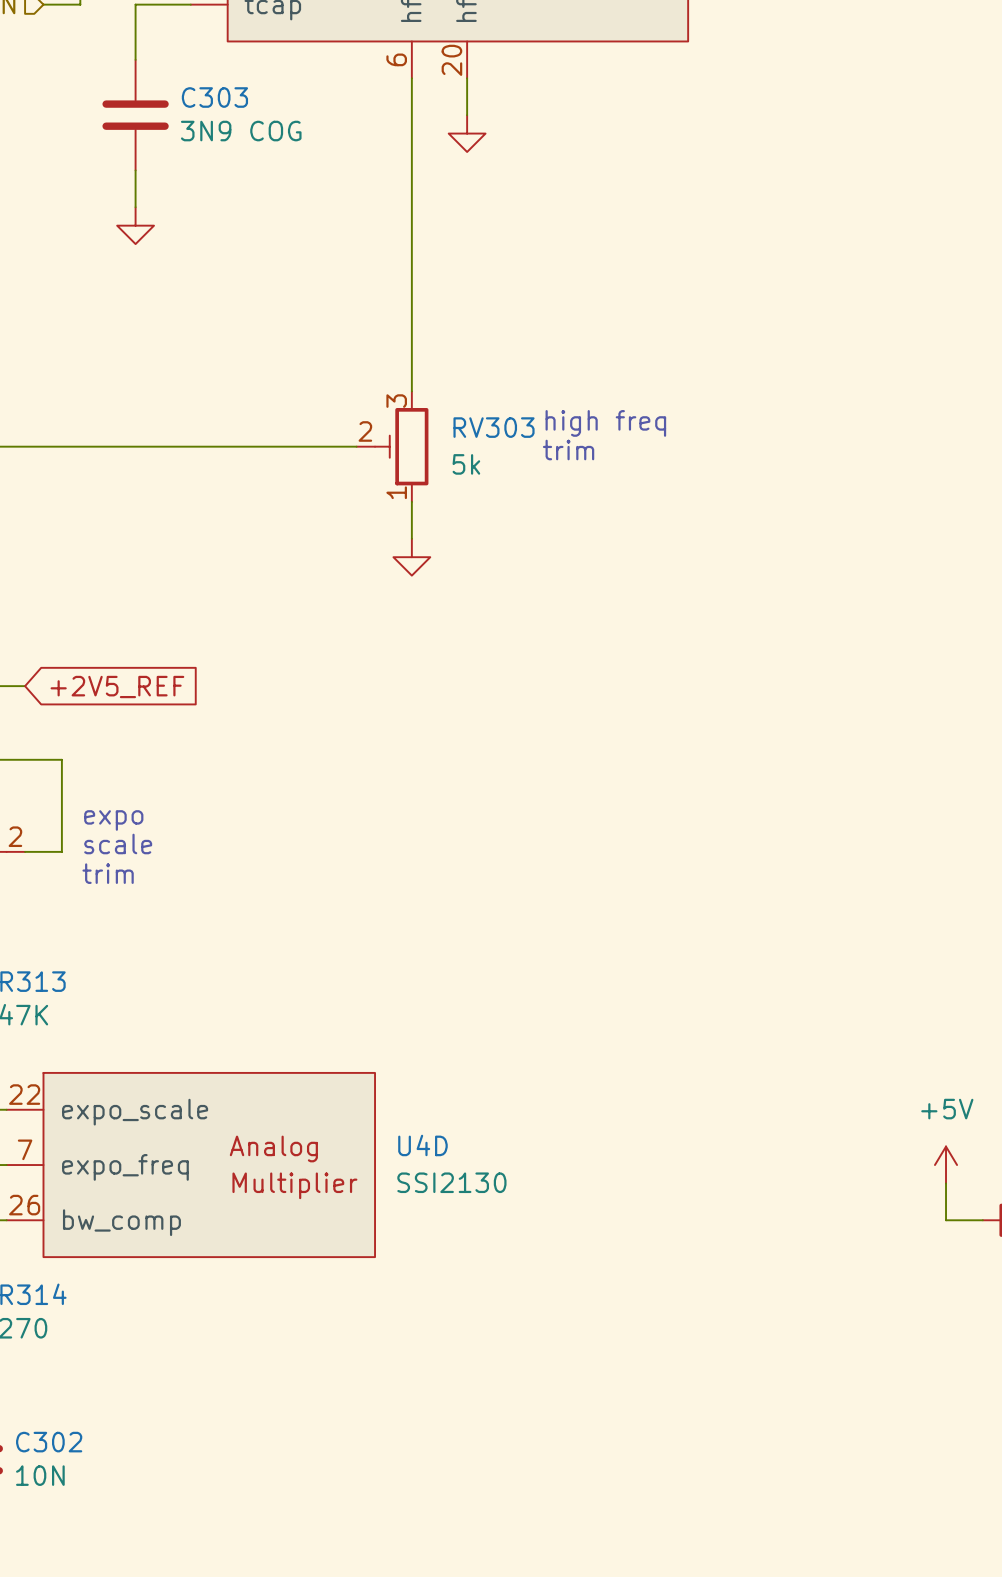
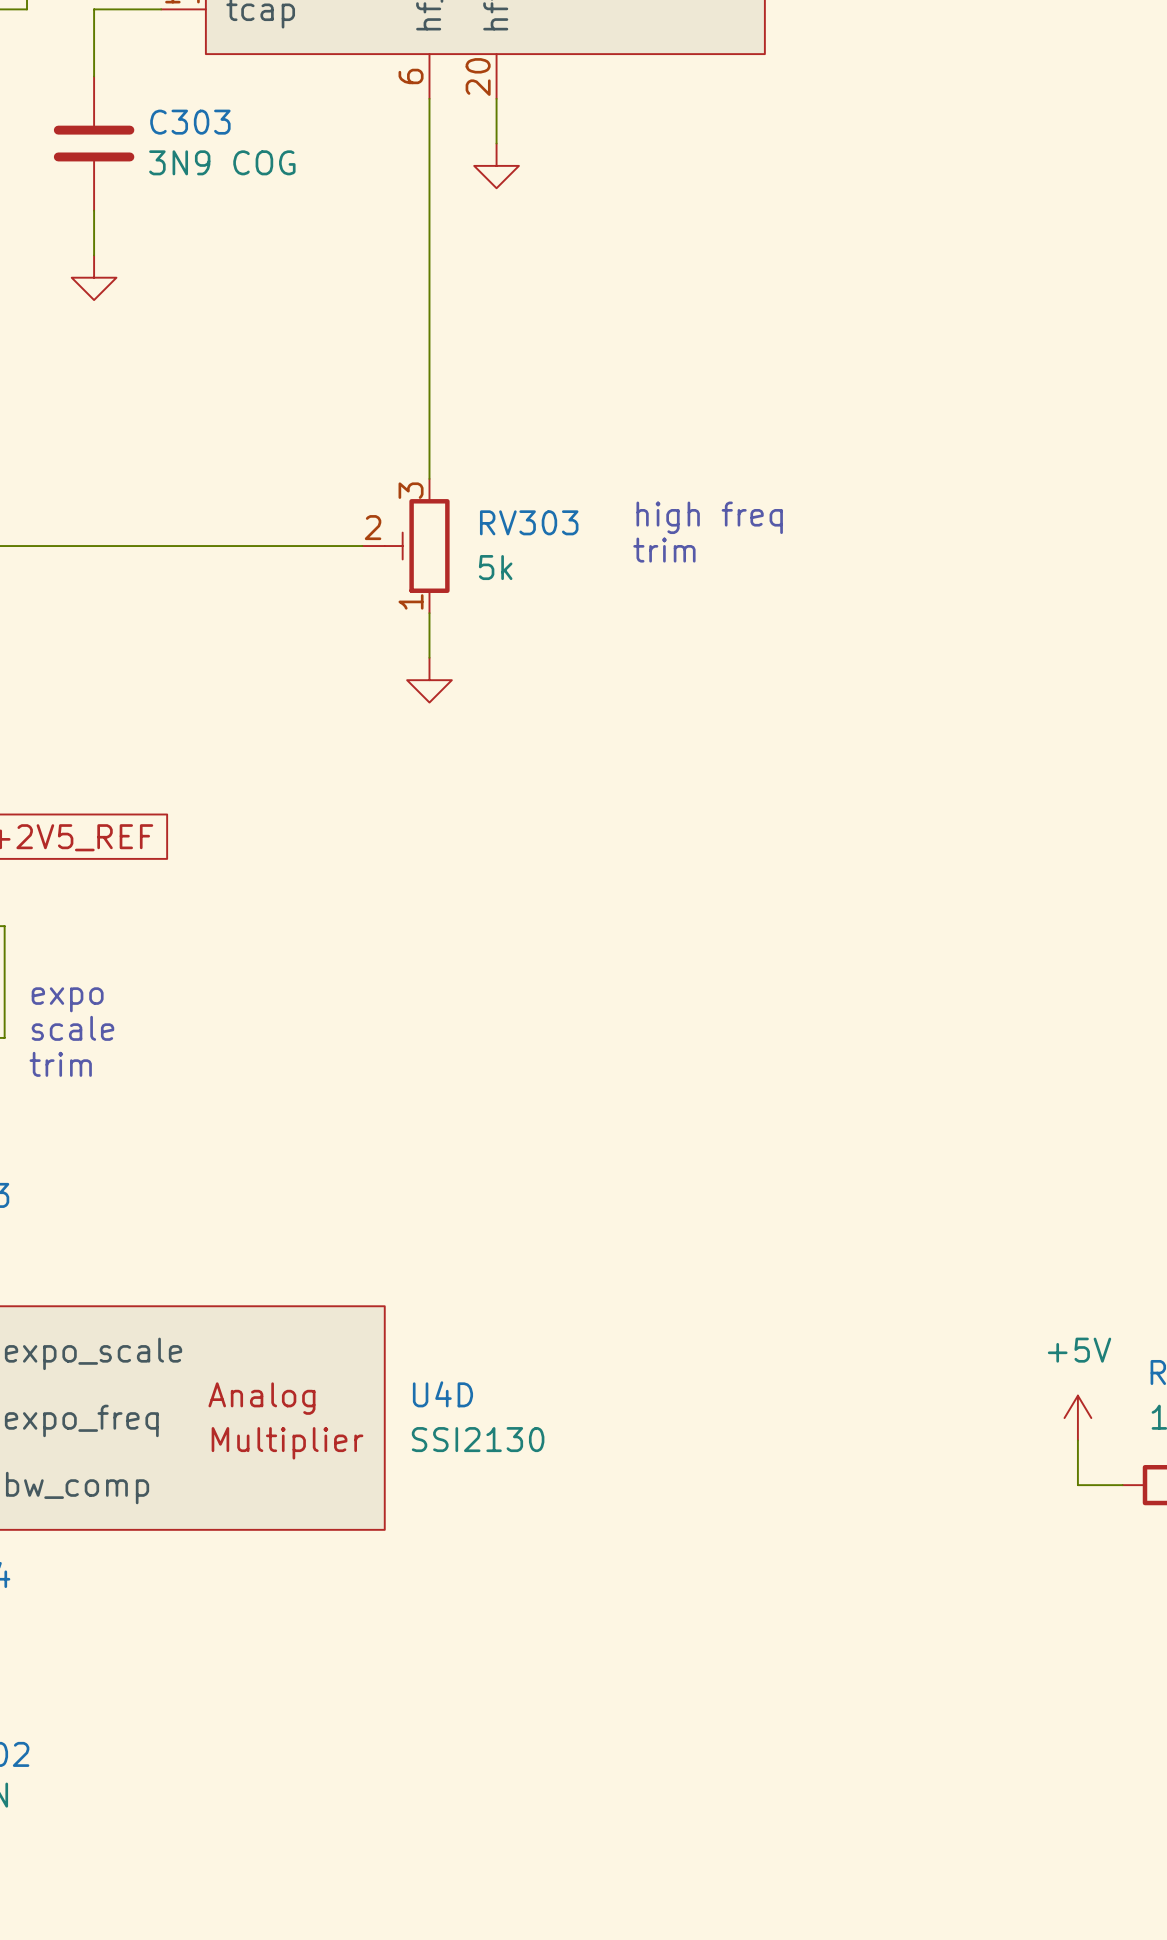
text position: high freq (605, 423) -> high freq (709, 517)
text position: trim (568, 450) -> trim (664, 550)

